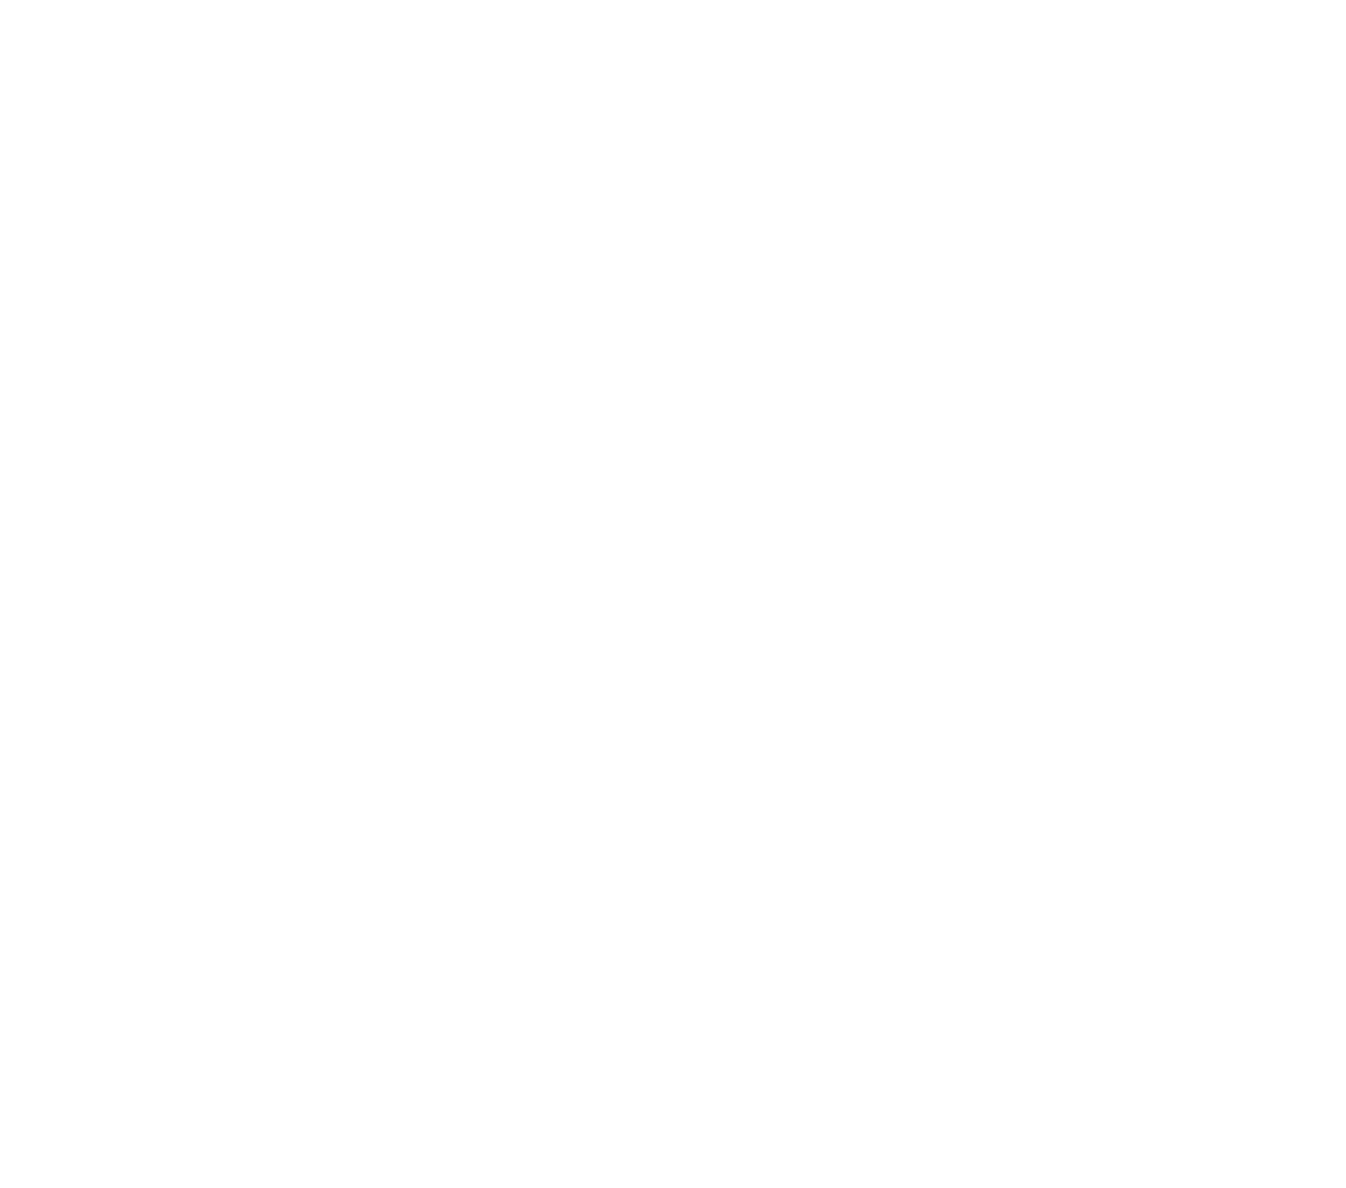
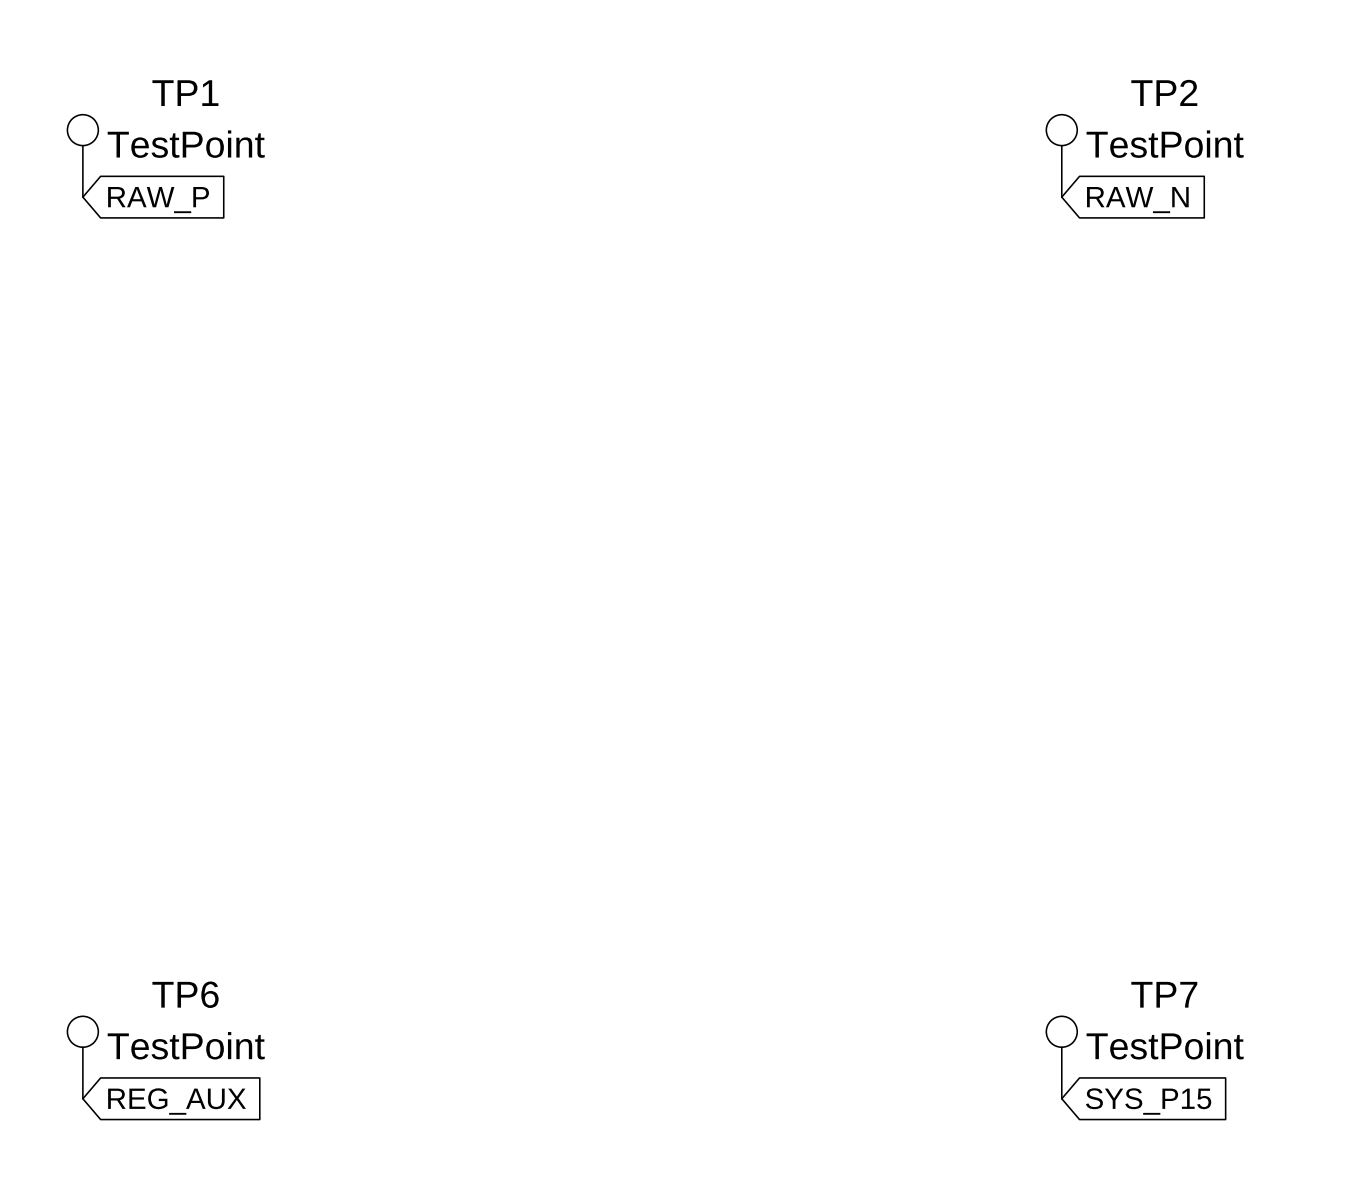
TP1: none -> TestPoint (82, 155)
TP2: none -> TestPoint (1061, 155)
global label: none -> RAW_P (158, 200)
global label: none -> RAW_N (1137, 200)
TP6: none -> TestPoint (82, 1057)
TP7: none -> TestPoint (1061, 1057)
global label: none -> REG_AUX (177, 1101)
global label: none -> SYS_P15 (1148, 1101)

